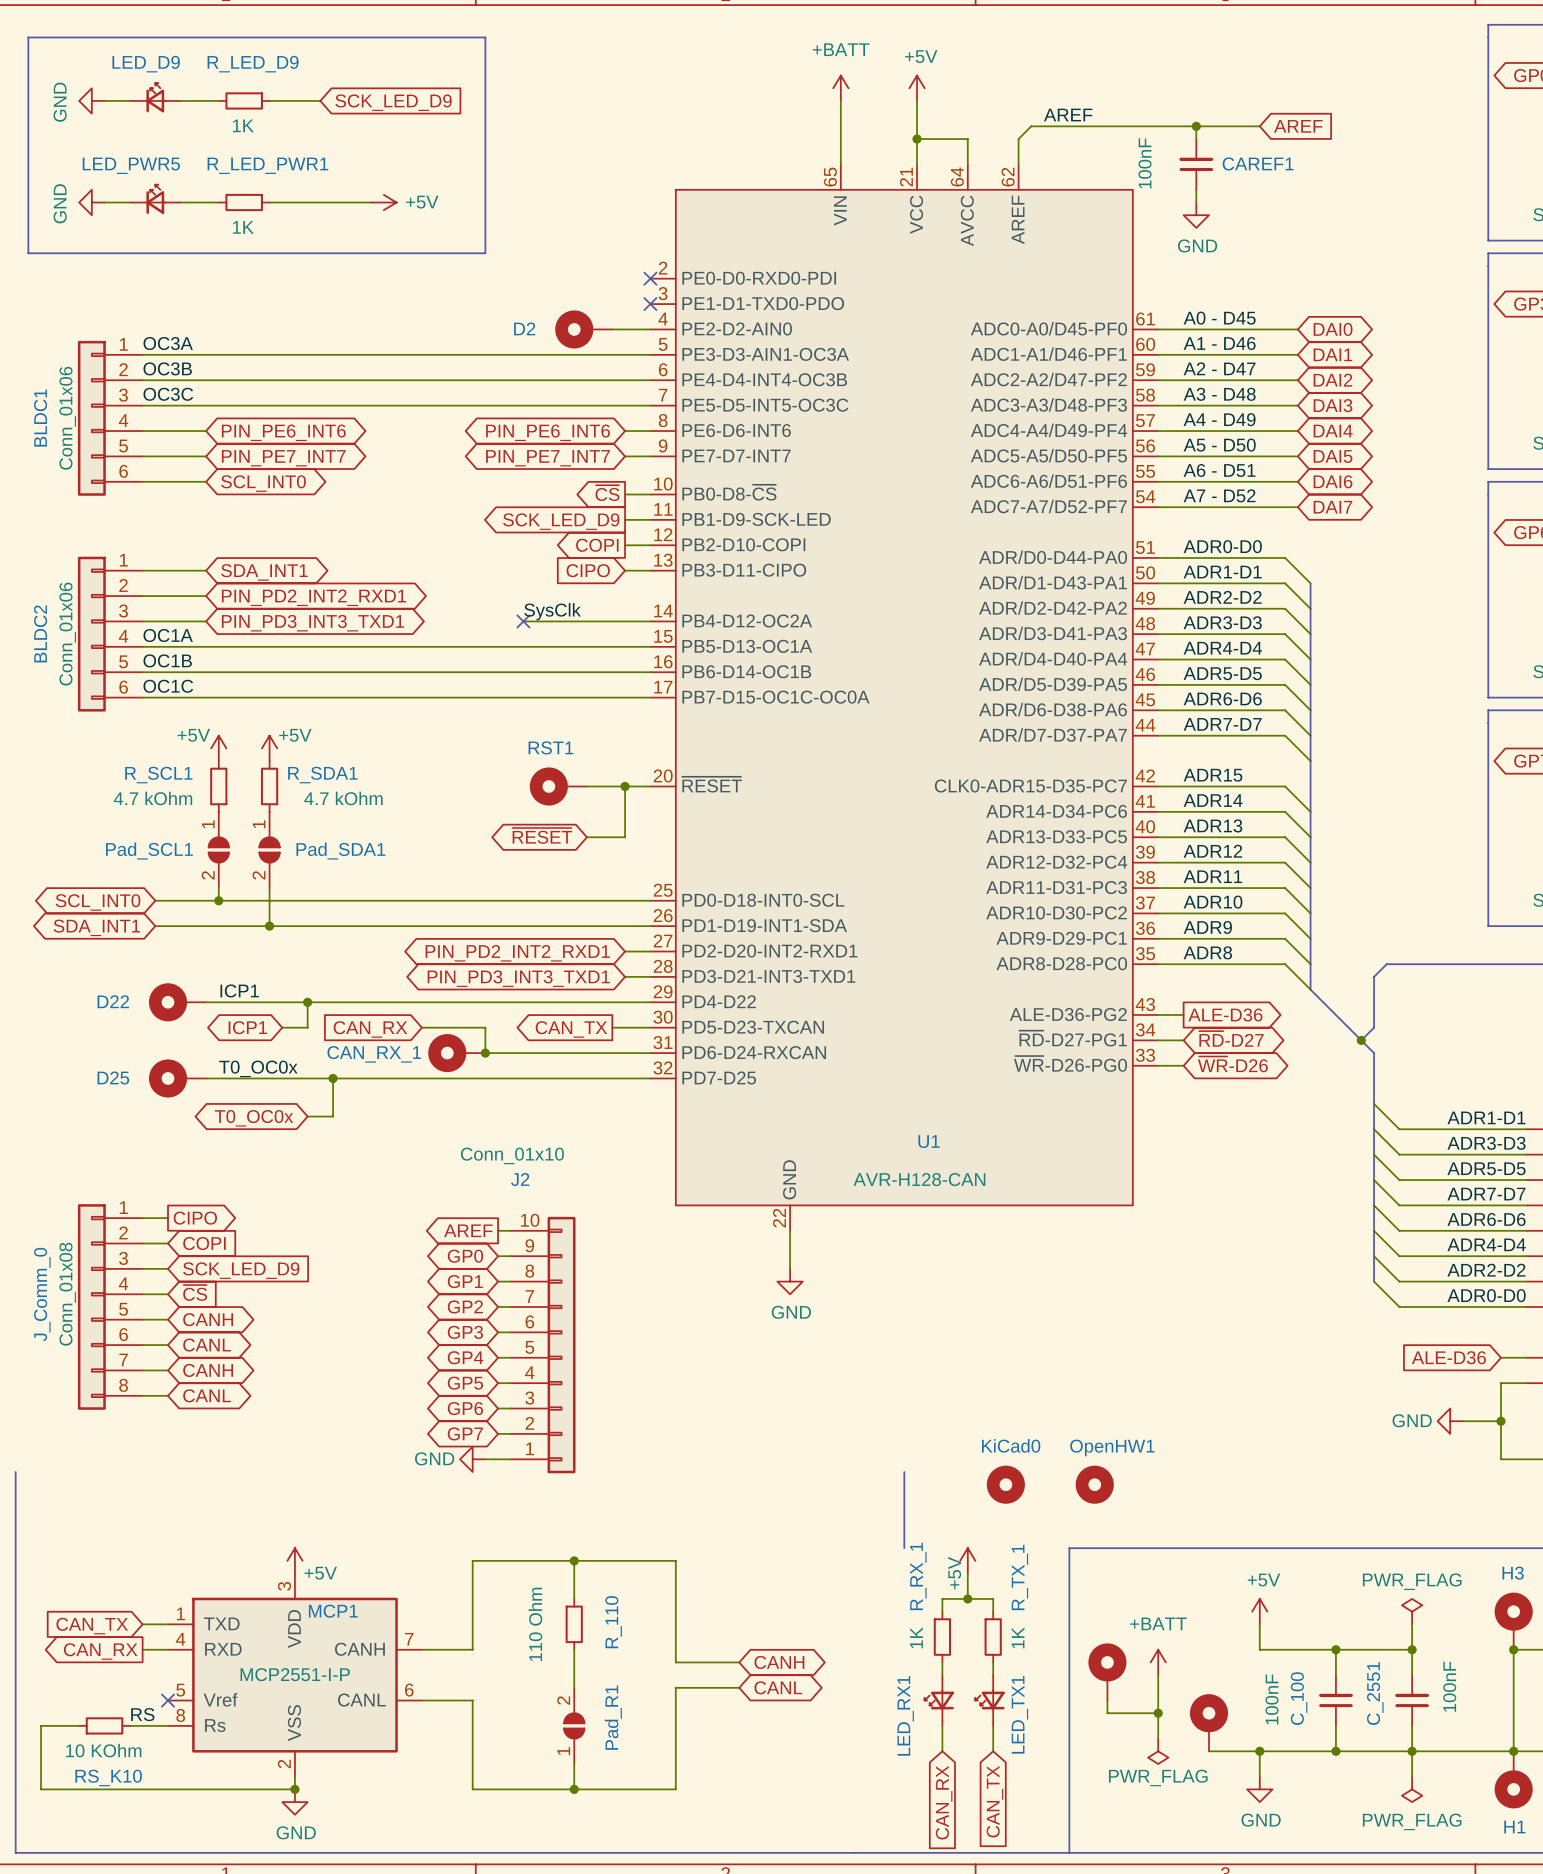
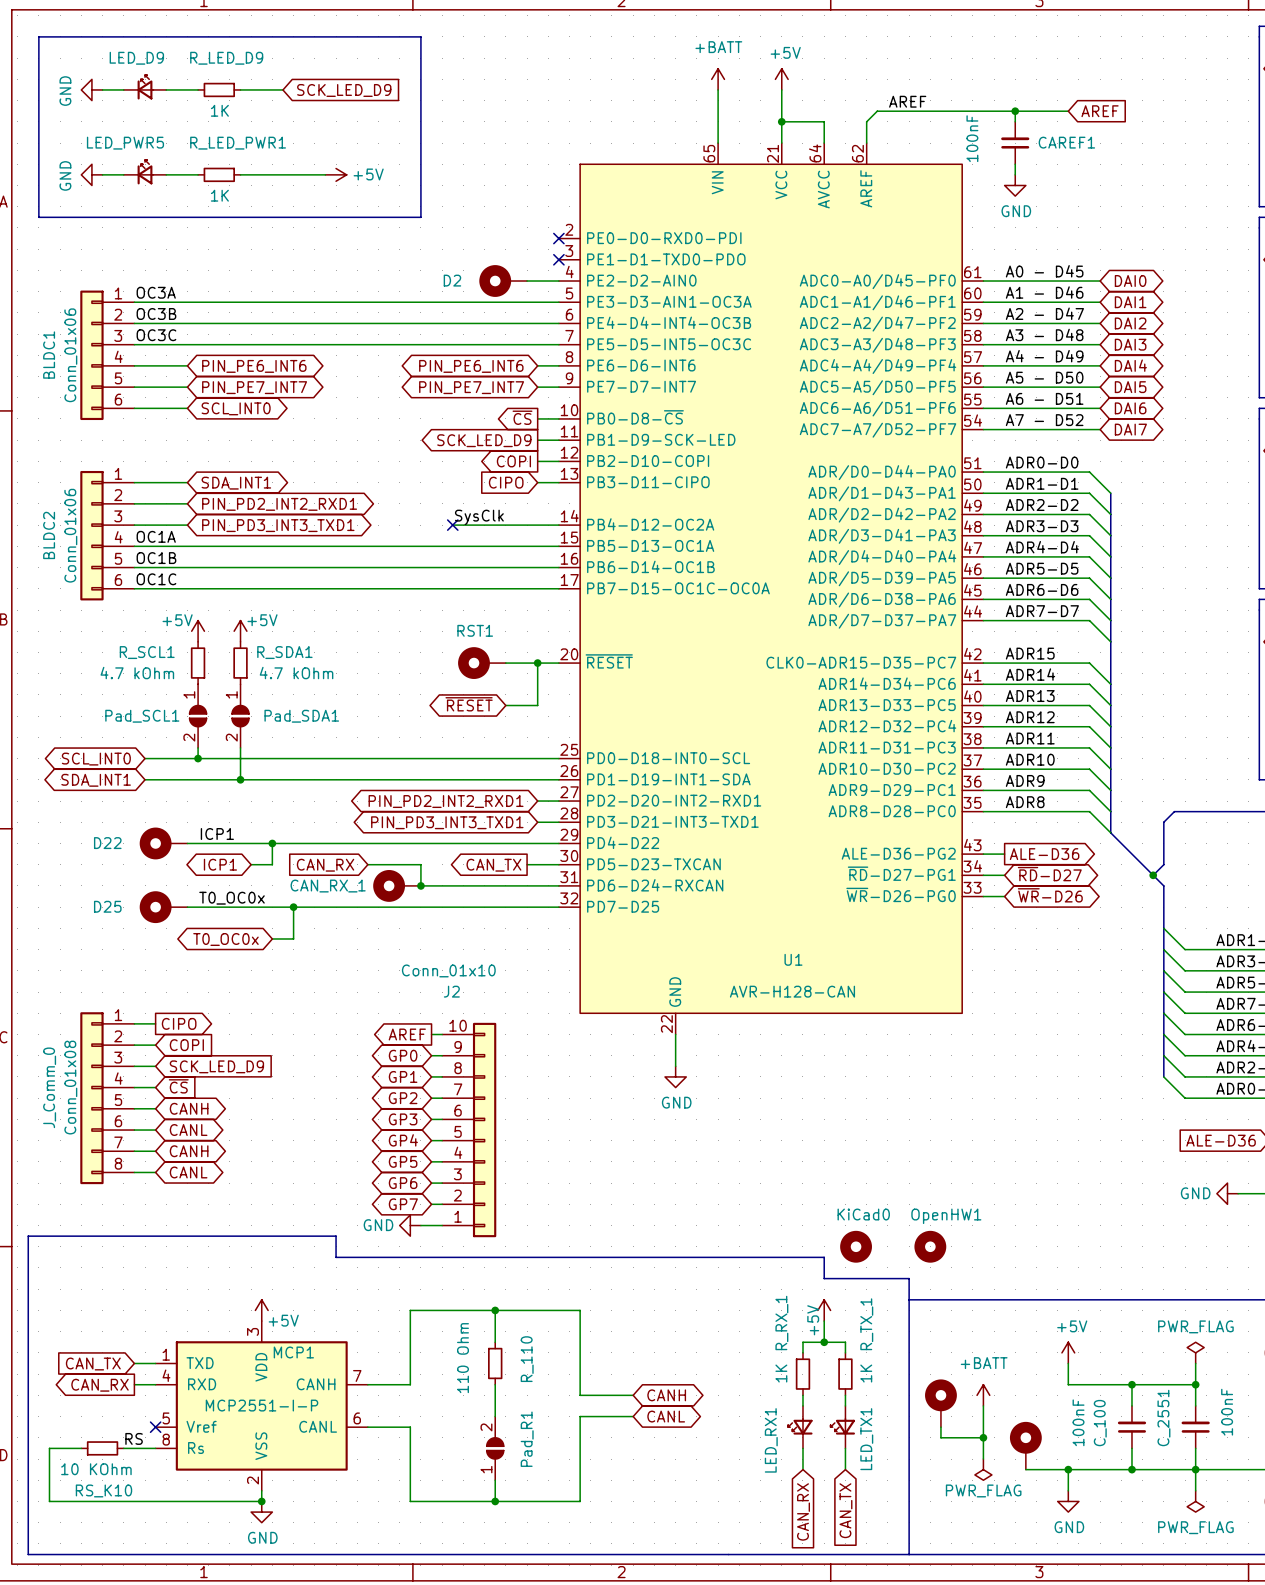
line: none -> (28, 1236) (336, 1236) (336, 1257) (824, 1257) (824, 1278) (909, 1278) (909, 1299)
line: (904, 1472) (904, 1548) -> none

